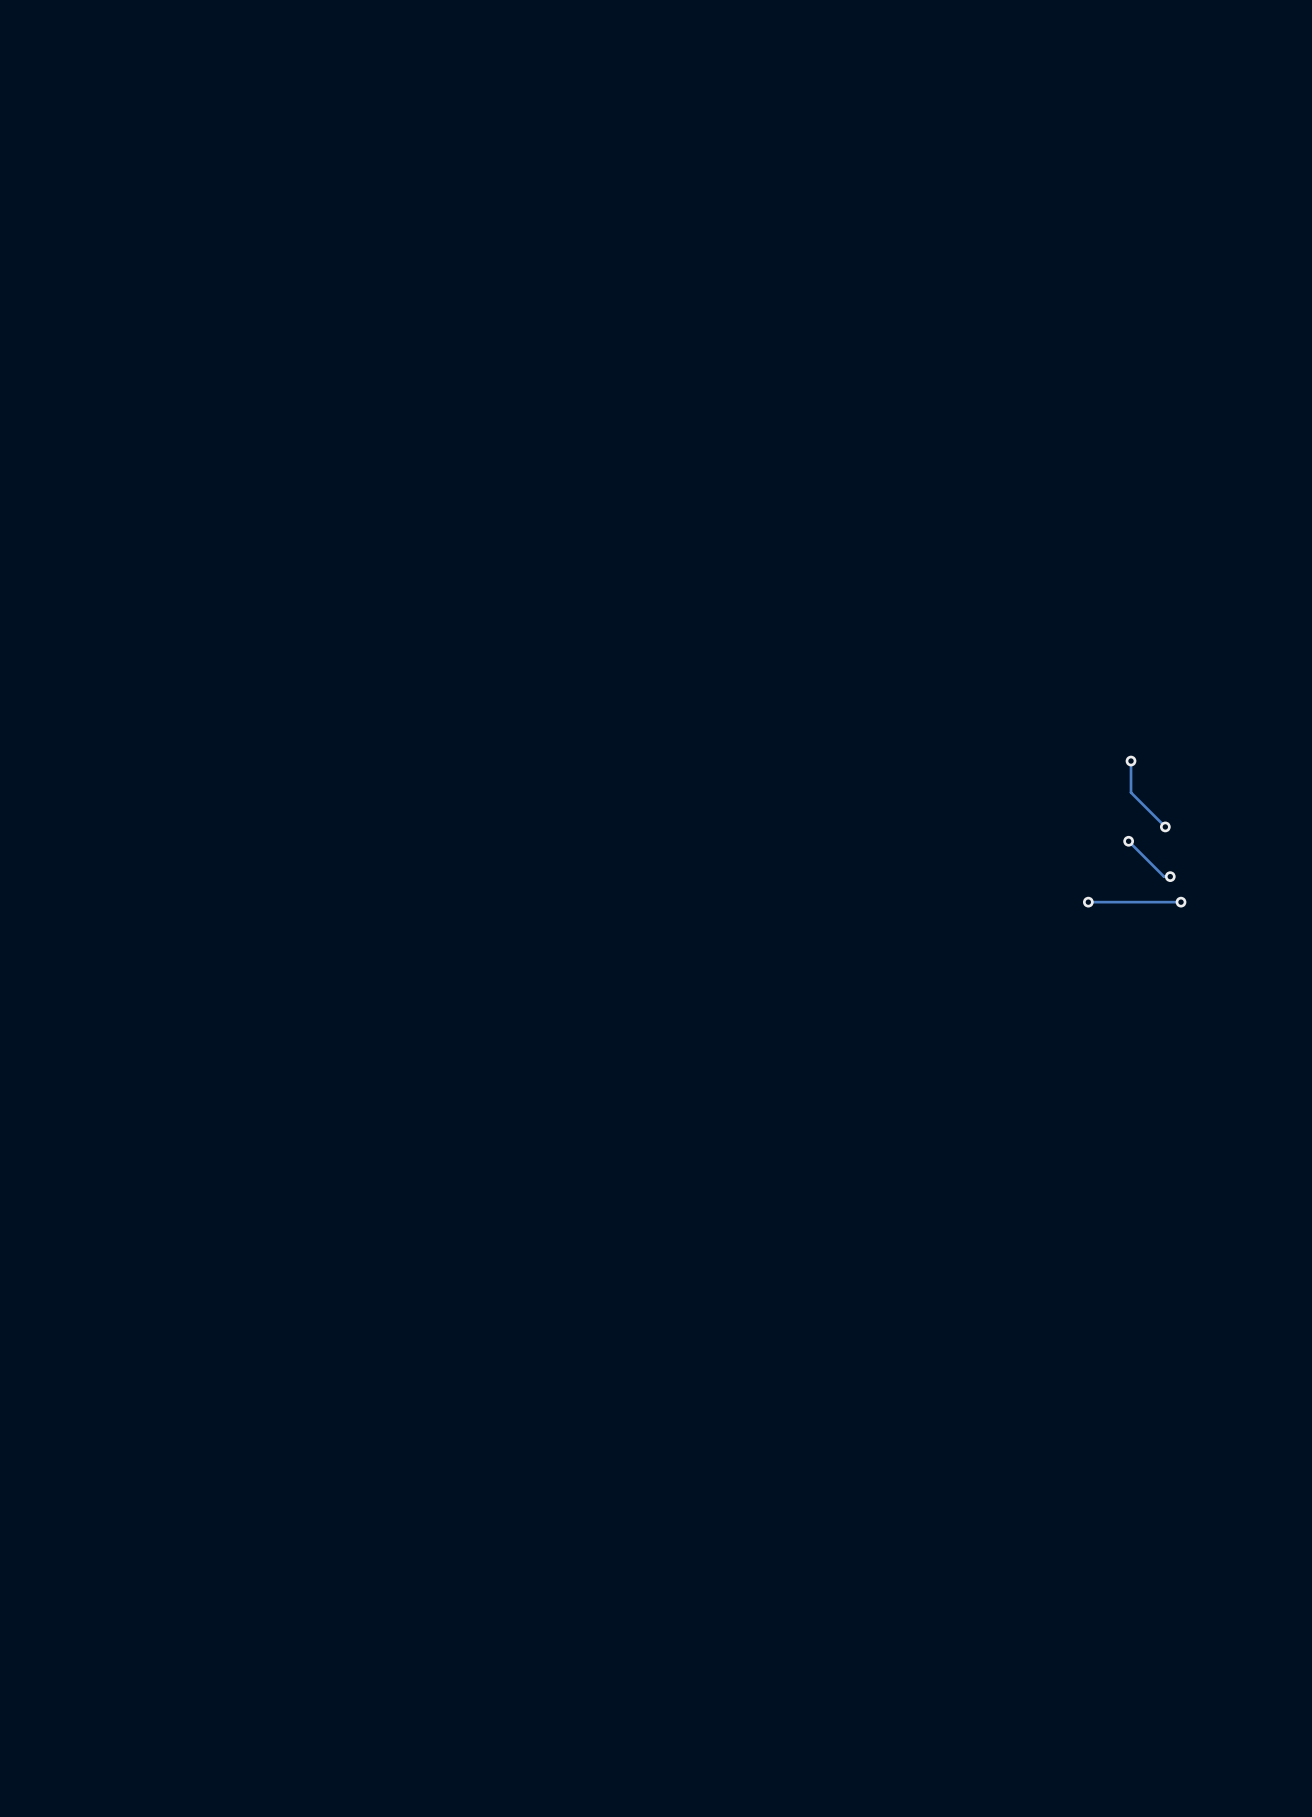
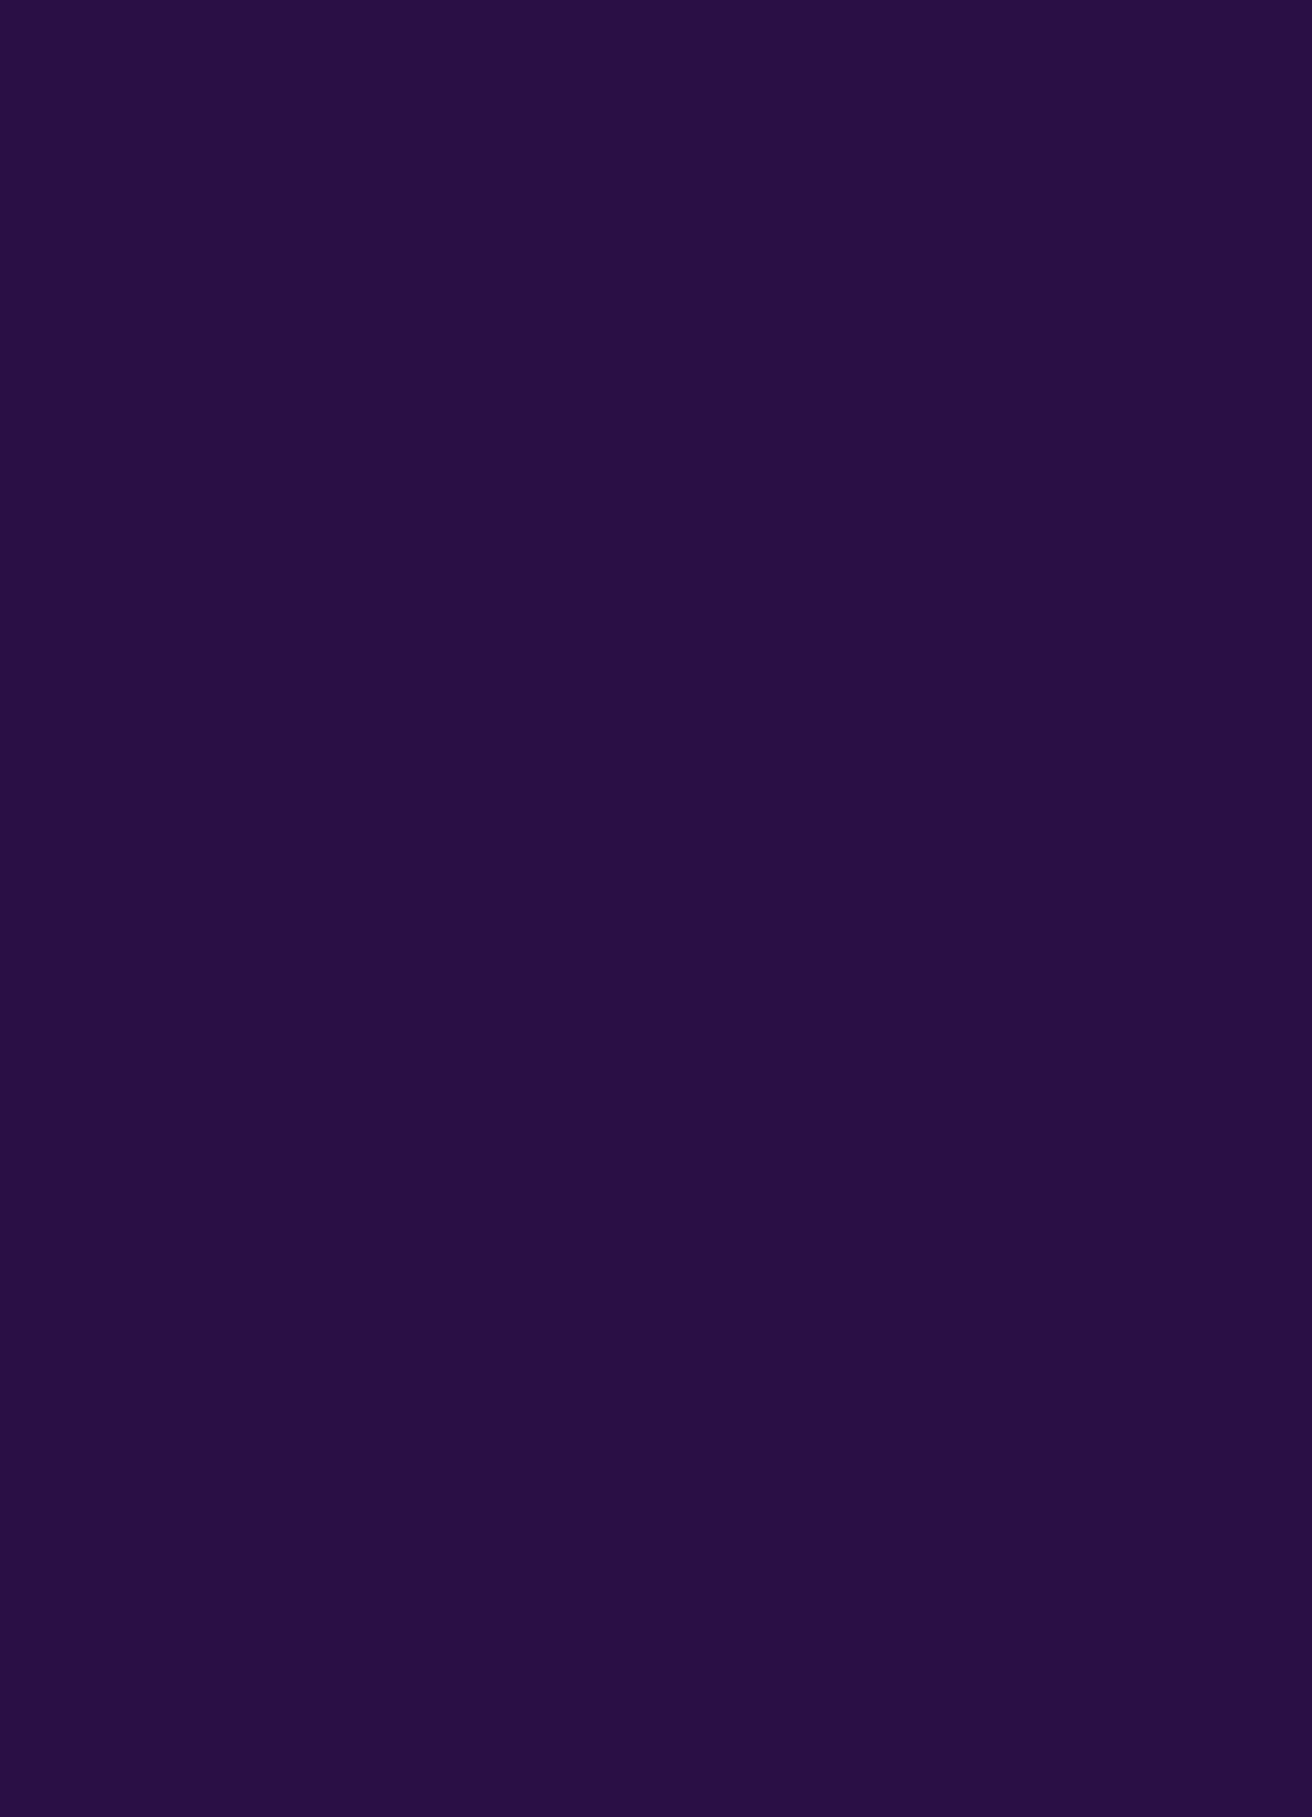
track: (1131, 761) (1131, 792) (1165, 826) -> none
via: (1131, 761) -> none
via: (1165, 826) -> none
track: (1128, 841) (1164, 876) (1170, 876) -> none
via: (1128, 841) -> none
via: (1170, 876) -> none
via: (1088, 902) -> none
track: (1181, 902) (1088, 902) -> none
via: (1181, 902) -> none

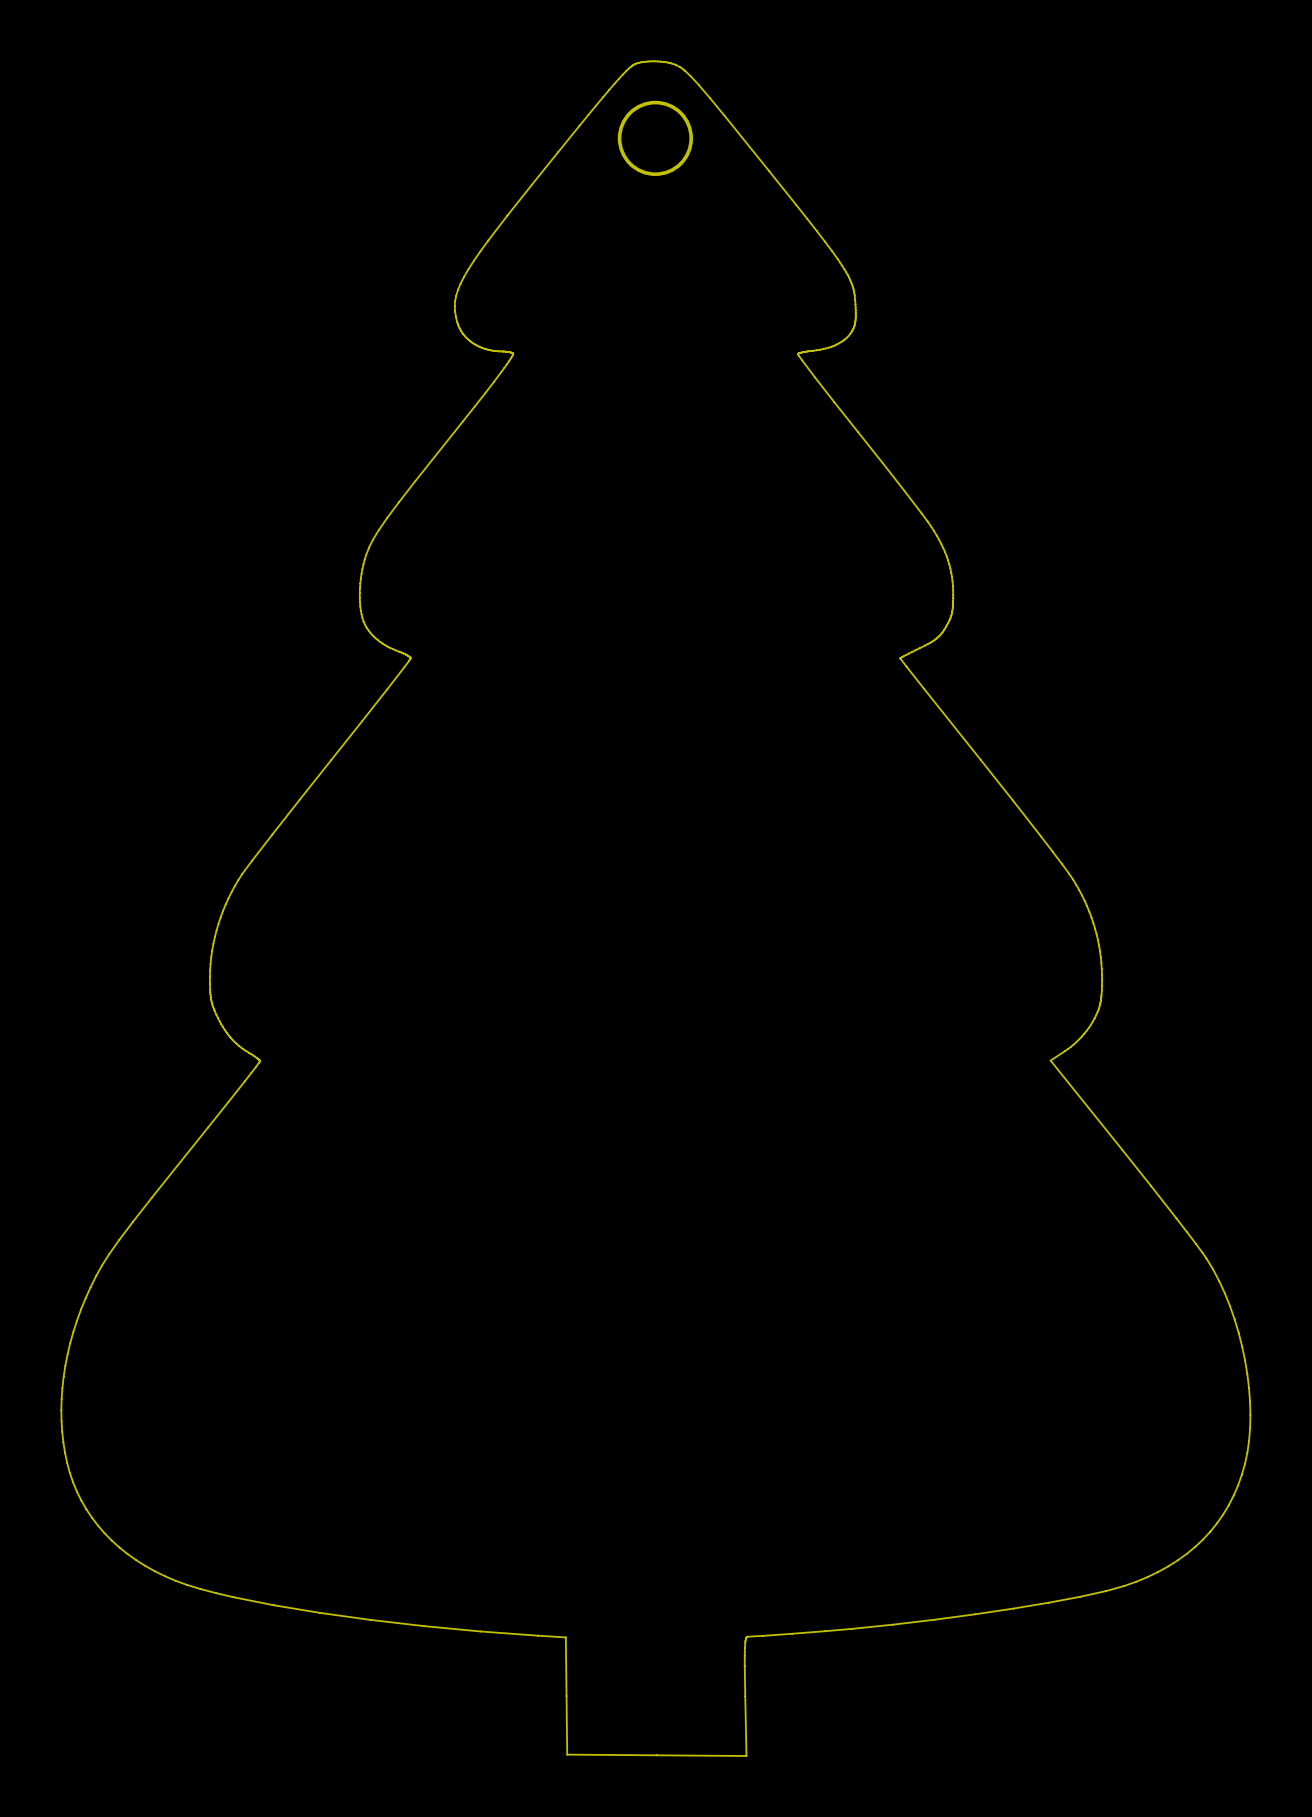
round board edge: none -> [617, 100, 693, 176]
board edge: none -> (513, 353) (493, 381) (387, 517) (373, 539) (366, 555) (359, 588) (360, 606) (363, 621) (368, 630) (378, 640) (410, 657)
board edge: none -> (797, 353) (927, 521) (939, 539) (948, 560) (953, 595) (952, 611) (948, 621) (935, 639) (900, 658)
board edge: none -> (798, 353) (834, 345) (845, 339) (851, 332) (855, 322) (855, 307) (853, 291) (849, 277) (816, 231) (698, 85) (679, 67) (668, 62) (654, 61) (634, 64) (614, 83) (507, 215) (474, 260) (460, 283) (456, 295) (455, 311) (458, 325) (463, 334) (470, 341) (481, 347) (513, 353)
board edge: none -> (410, 658) (252, 860) (234, 885) (223, 910) (211, 957) (209, 984) (211, 1002) (219, 1021) (230, 1037) (259, 1060)
board edge: none -> (900, 658) (1052, 851) (1082, 895) (1091, 917) (1099, 945) (1101, 974) (1100, 1002) (1094, 1018) (1084, 1033) (1070, 1046) (1050, 1060) (1206, 1258) (1224, 1293) (1238, 1332) (1247, 1374) (1250, 1415) (1247, 1452) (1241, 1475) (1233, 1495) (1217, 1523) (1195, 1546) (1168, 1566) (1124, 1586) (1048, 1602) (893, 1624) (747, 1636) (744, 1655) (746, 1756) (567, 1754) (565, 1637) (424, 1626) (319, 1612) (216, 1593) (187, 1584) (154, 1571) (127, 1553) (104, 1533) (86, 1509) (73, 1482) (65, 1452) (61, 1421) (62, 1388) (67, 1354) (85, 1298) (109, 1254) (260, 1061)

